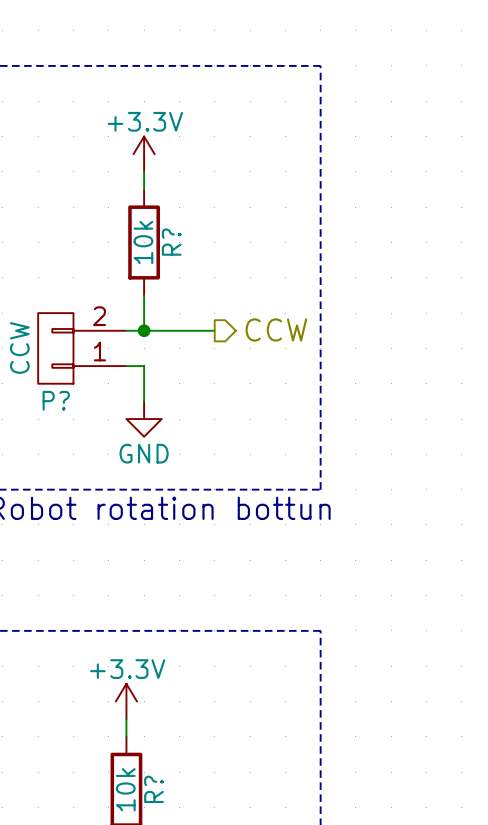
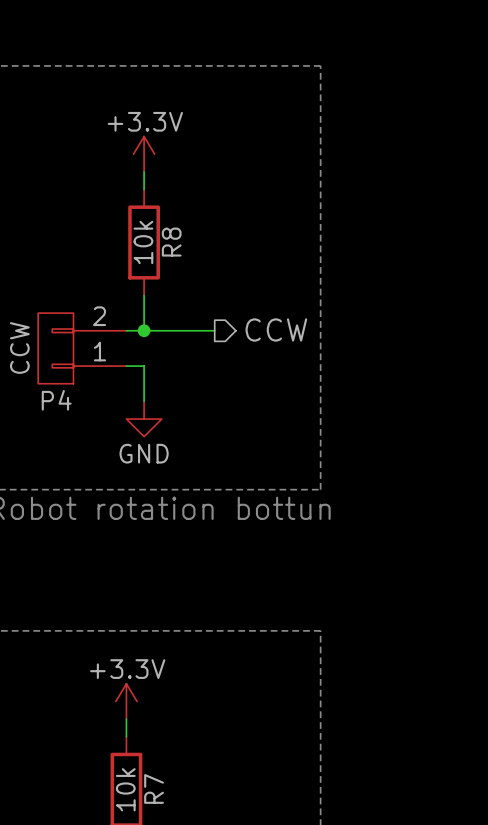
R? name: R? (171, 242) -> R8 (171, 242)
P? name: P? (56, 400) -> P4 (56, 400)
R? name: R? (154, 789) -> R7 (154, 788)

